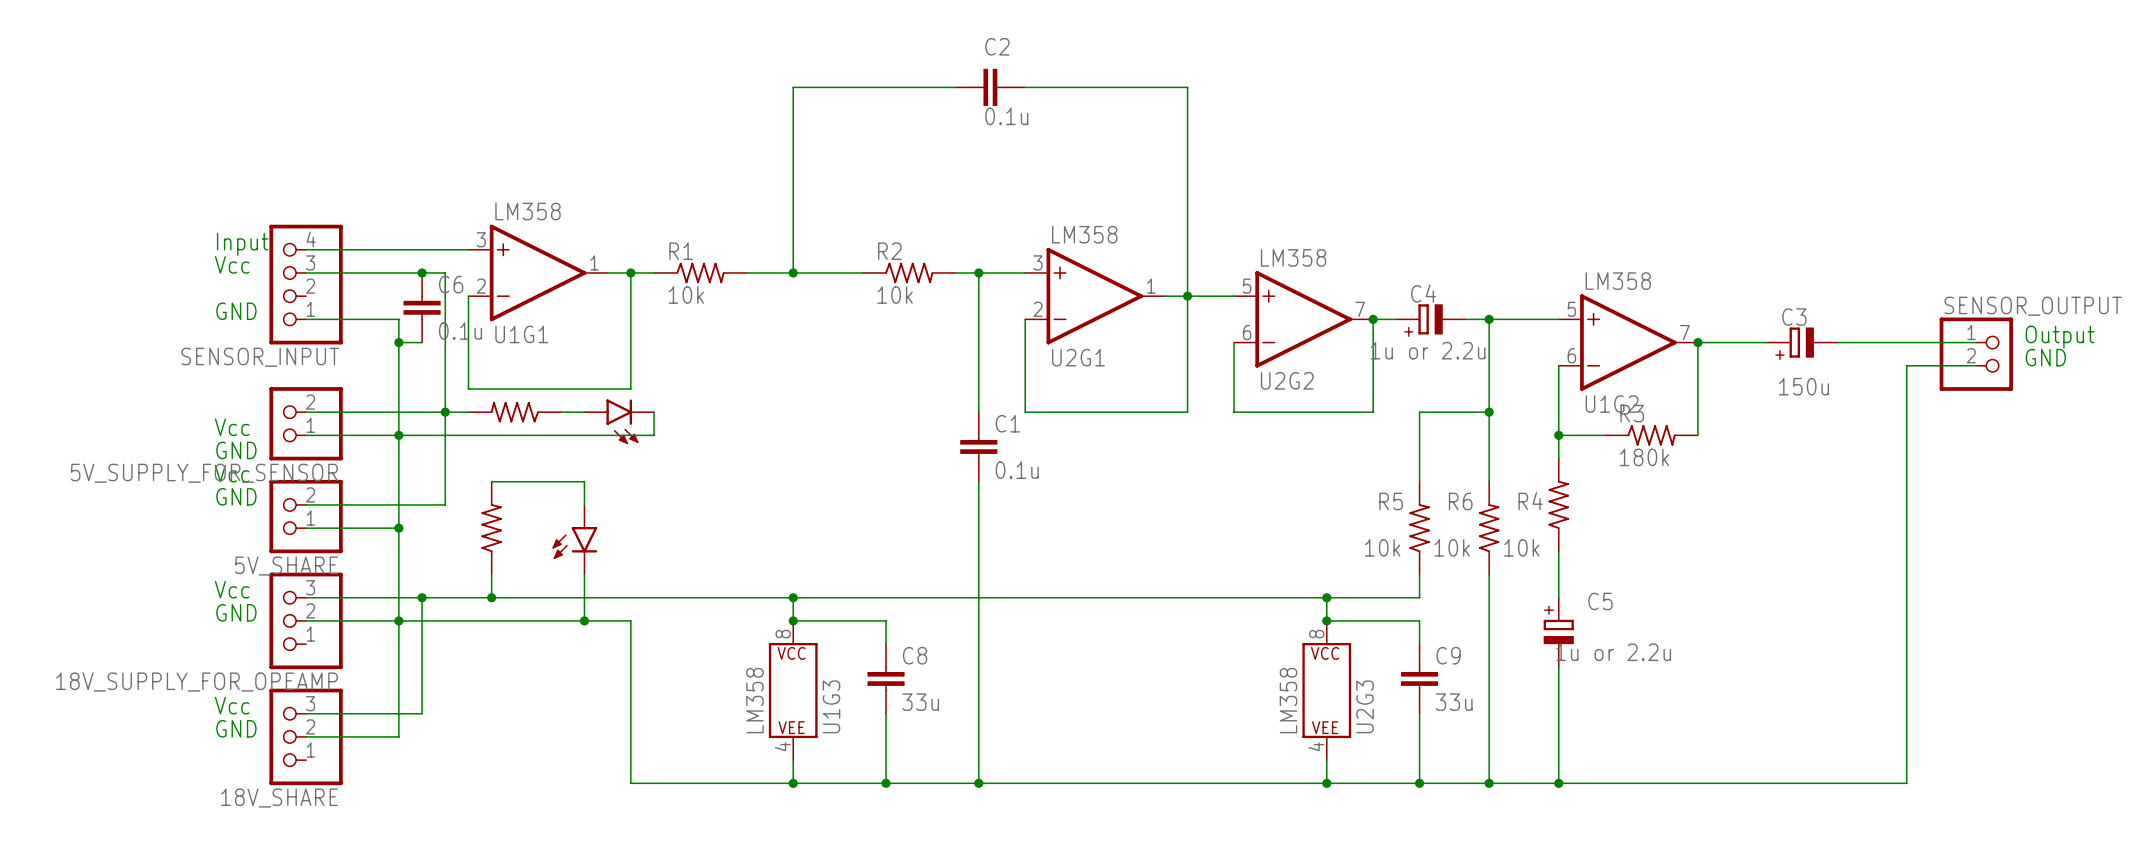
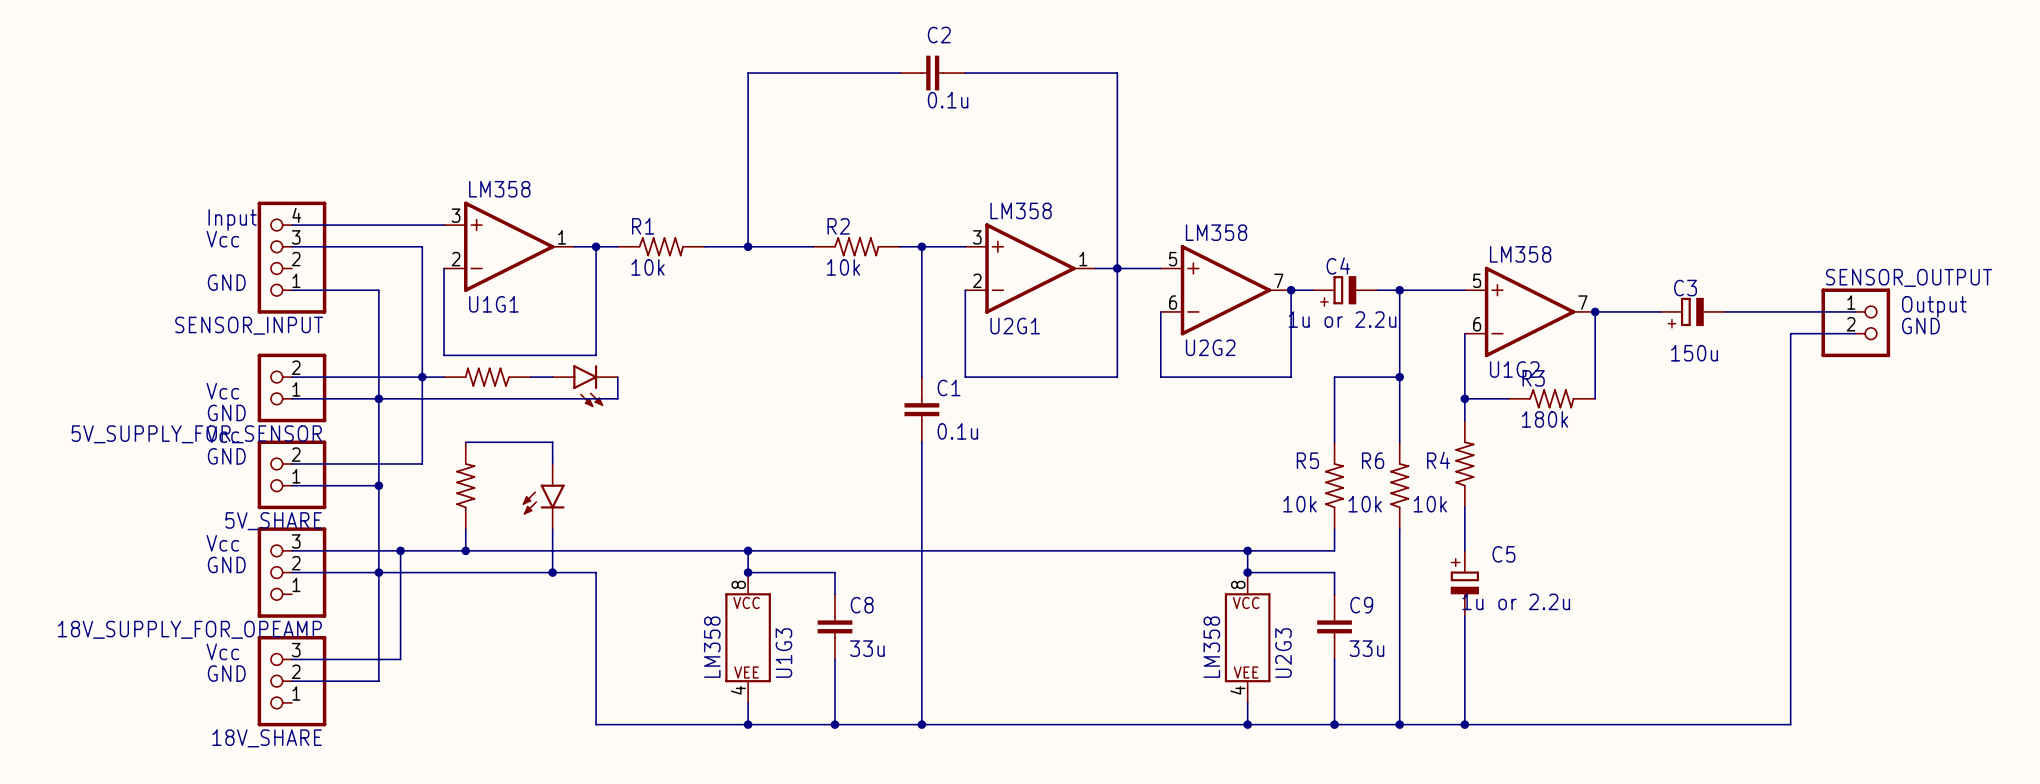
junction: (422, 272) -> none
C6: 0.1u (422, 307) -> none
wire: (398, 342) (422, 342) -> none
junction: (398, 342) -> none

